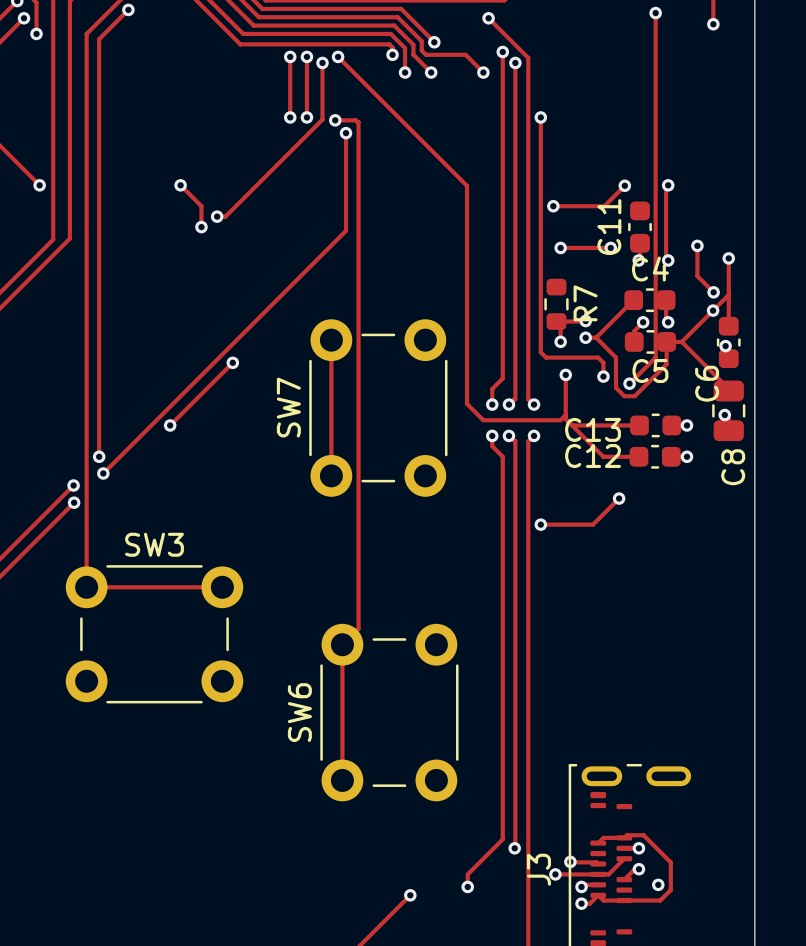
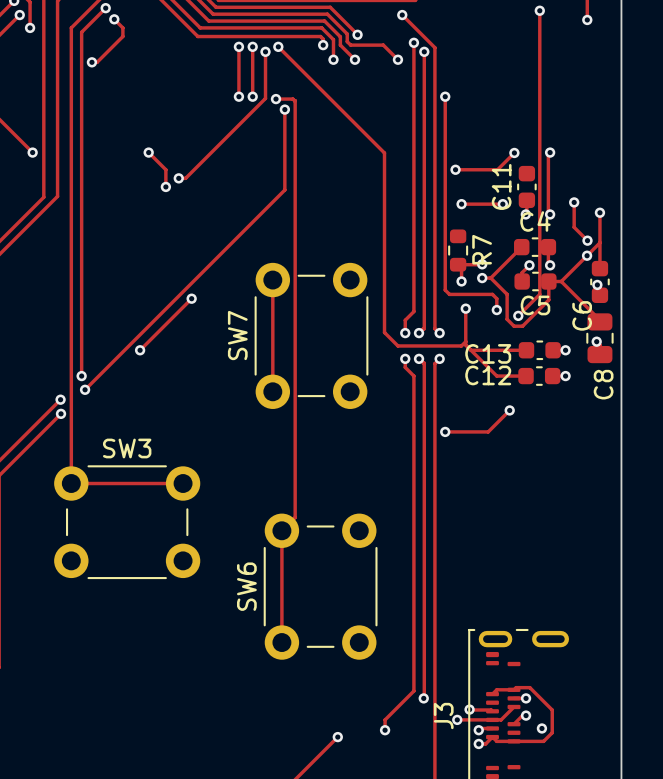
track: none -> (114, 19) (122, 27) (122, 36) (97, 62) (91, 62)
via: none -> (114, 19)
via: none -> (91, 62)

